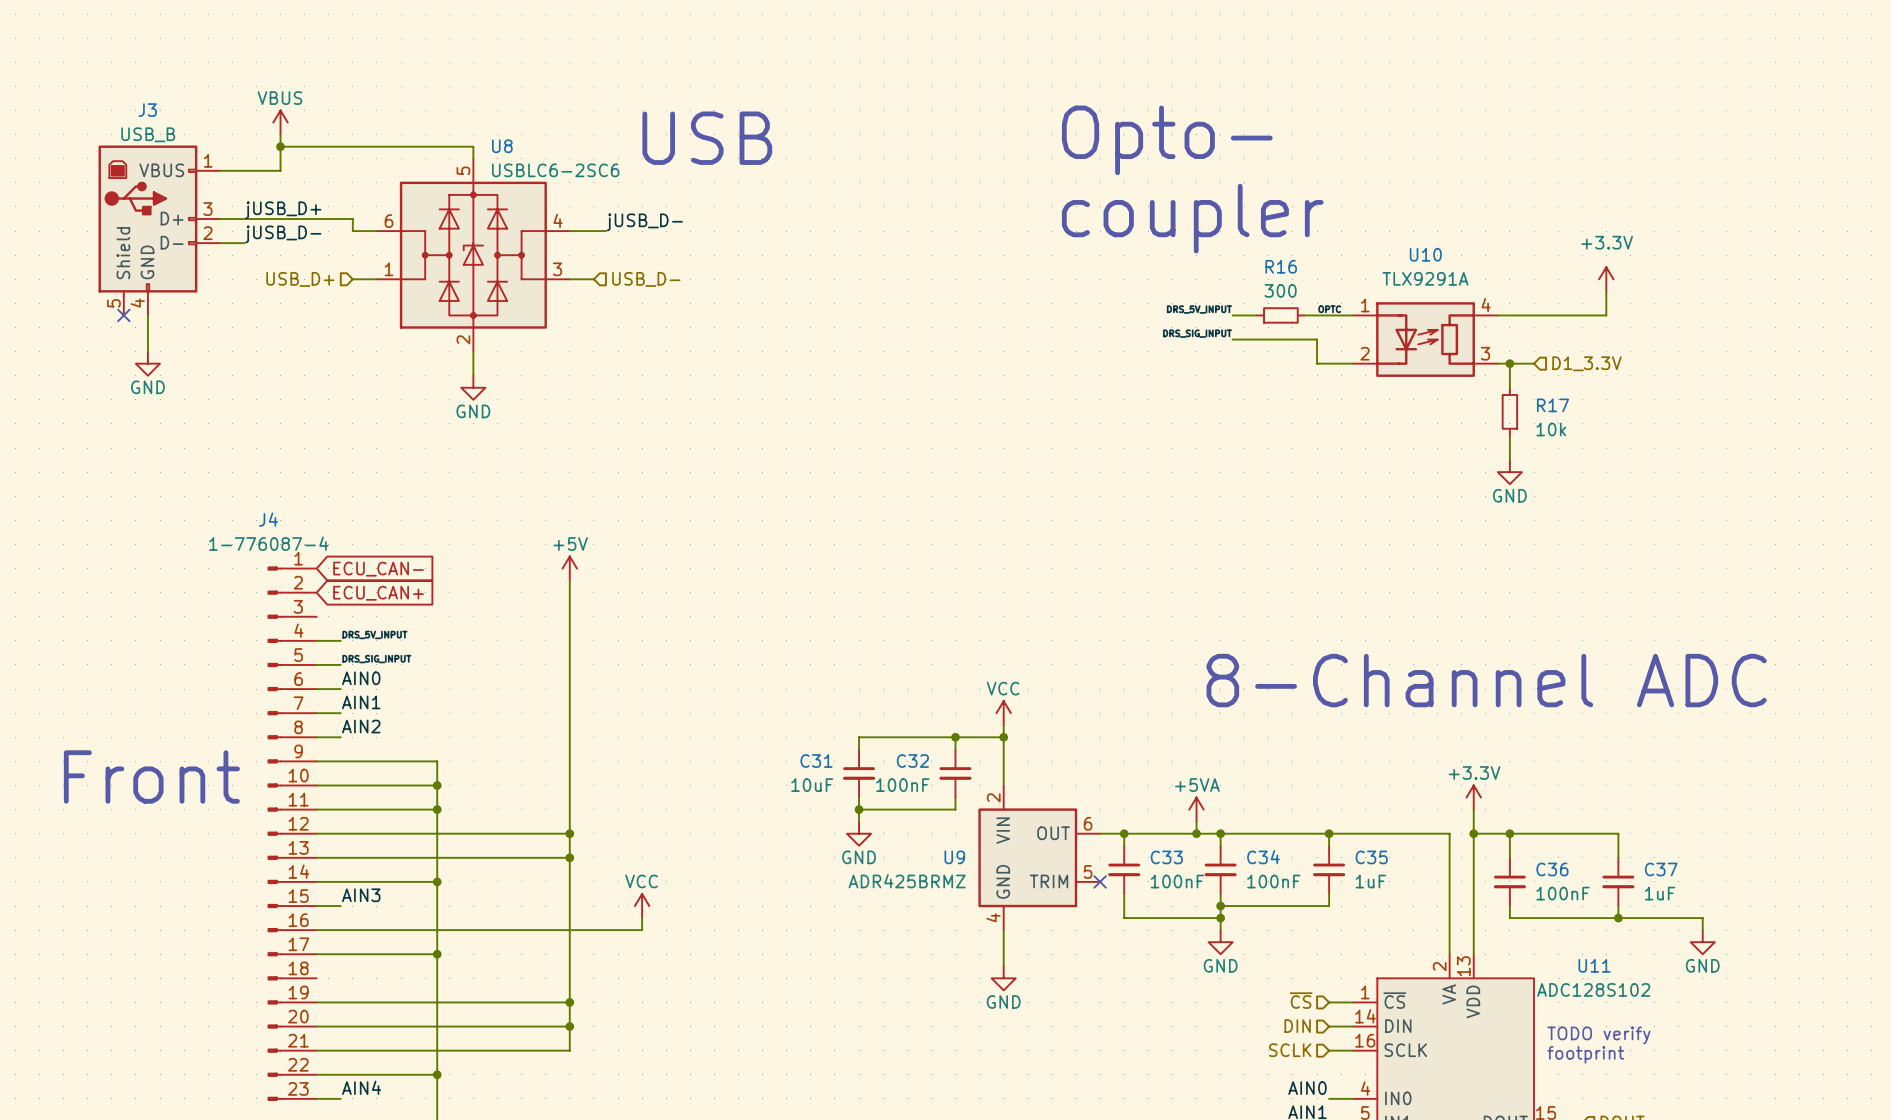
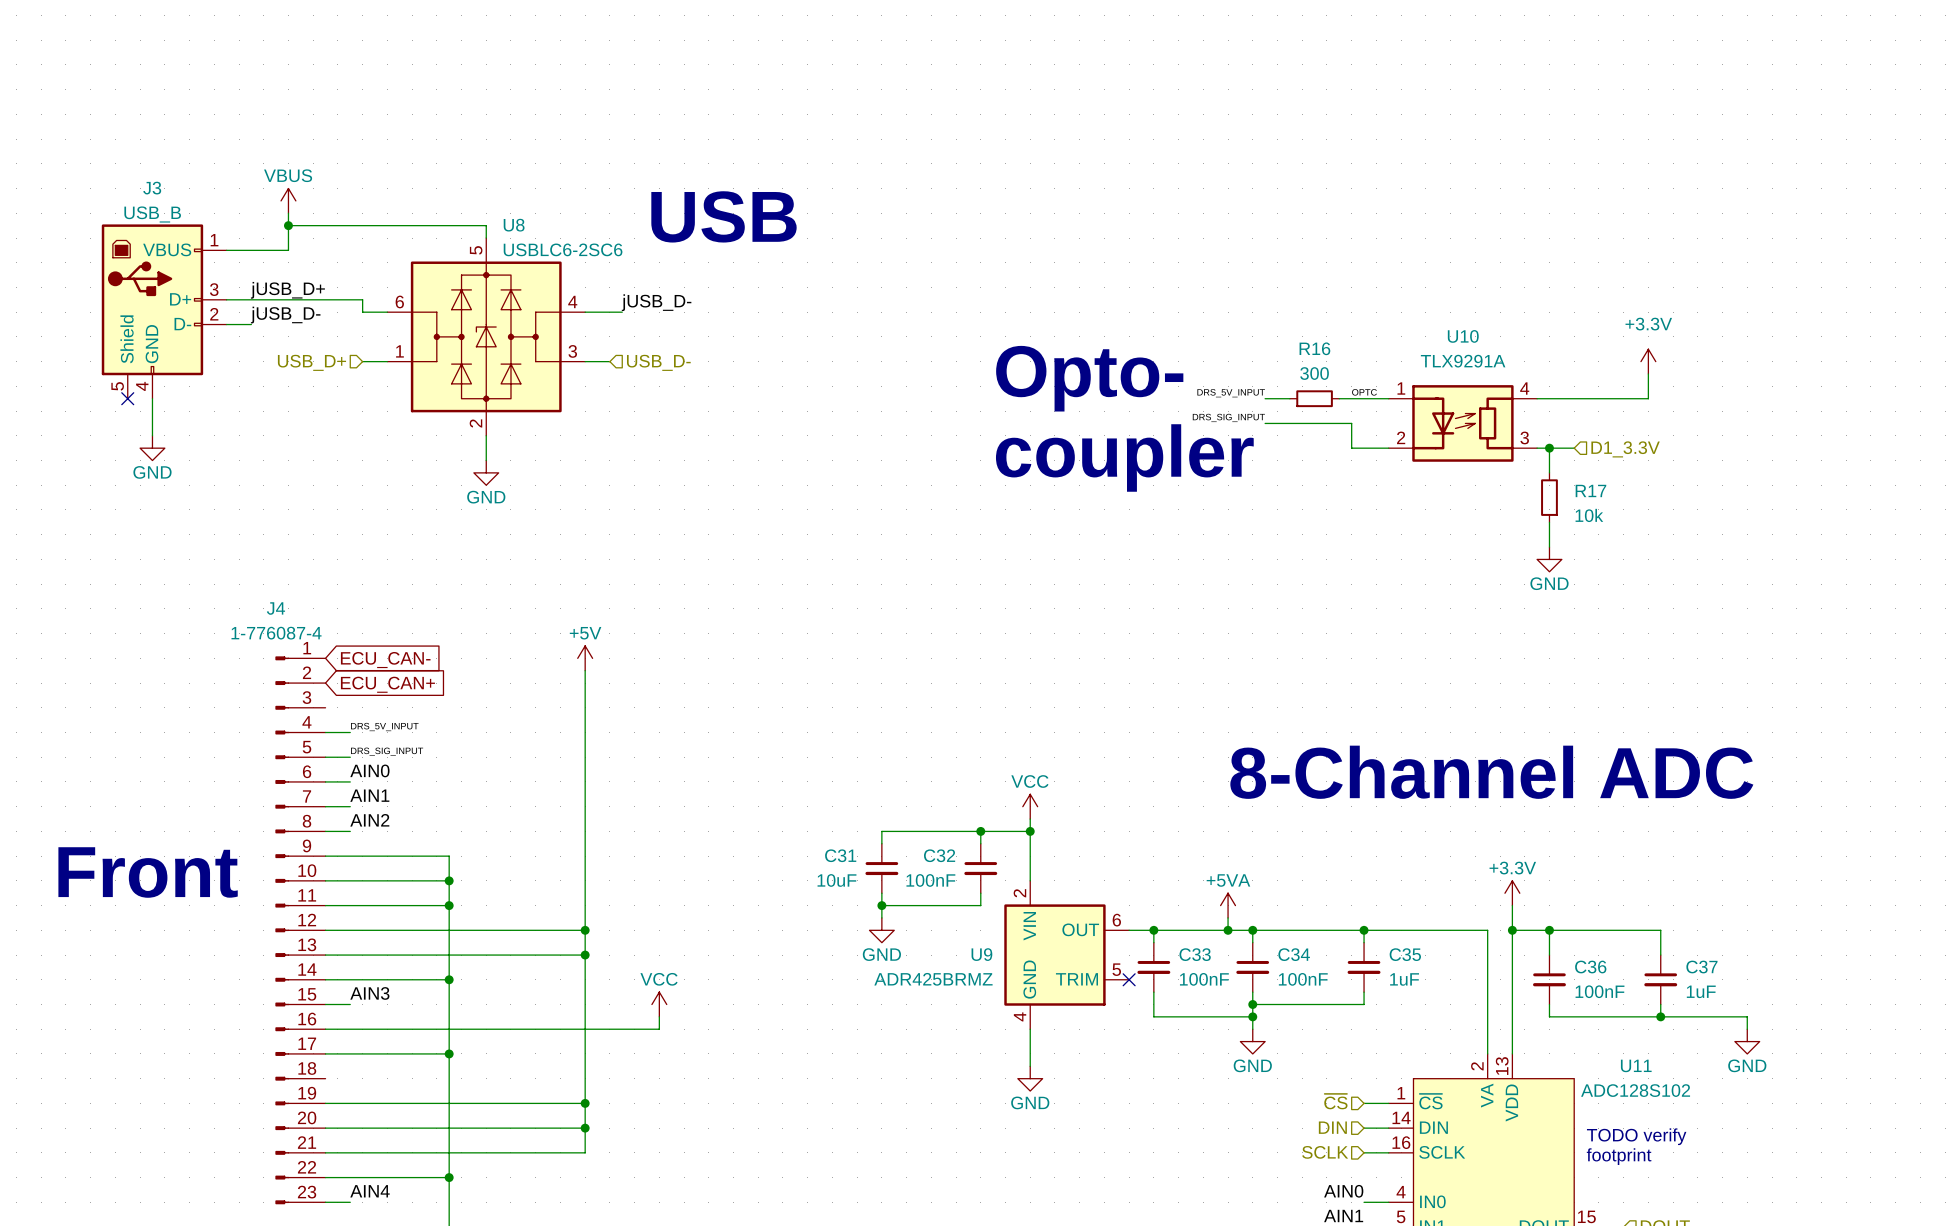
text position: Opto- (1167, 140) -> Opto- (1089, 378)
text position: coupler (1192, 218) -> coupler (1124, 457)

